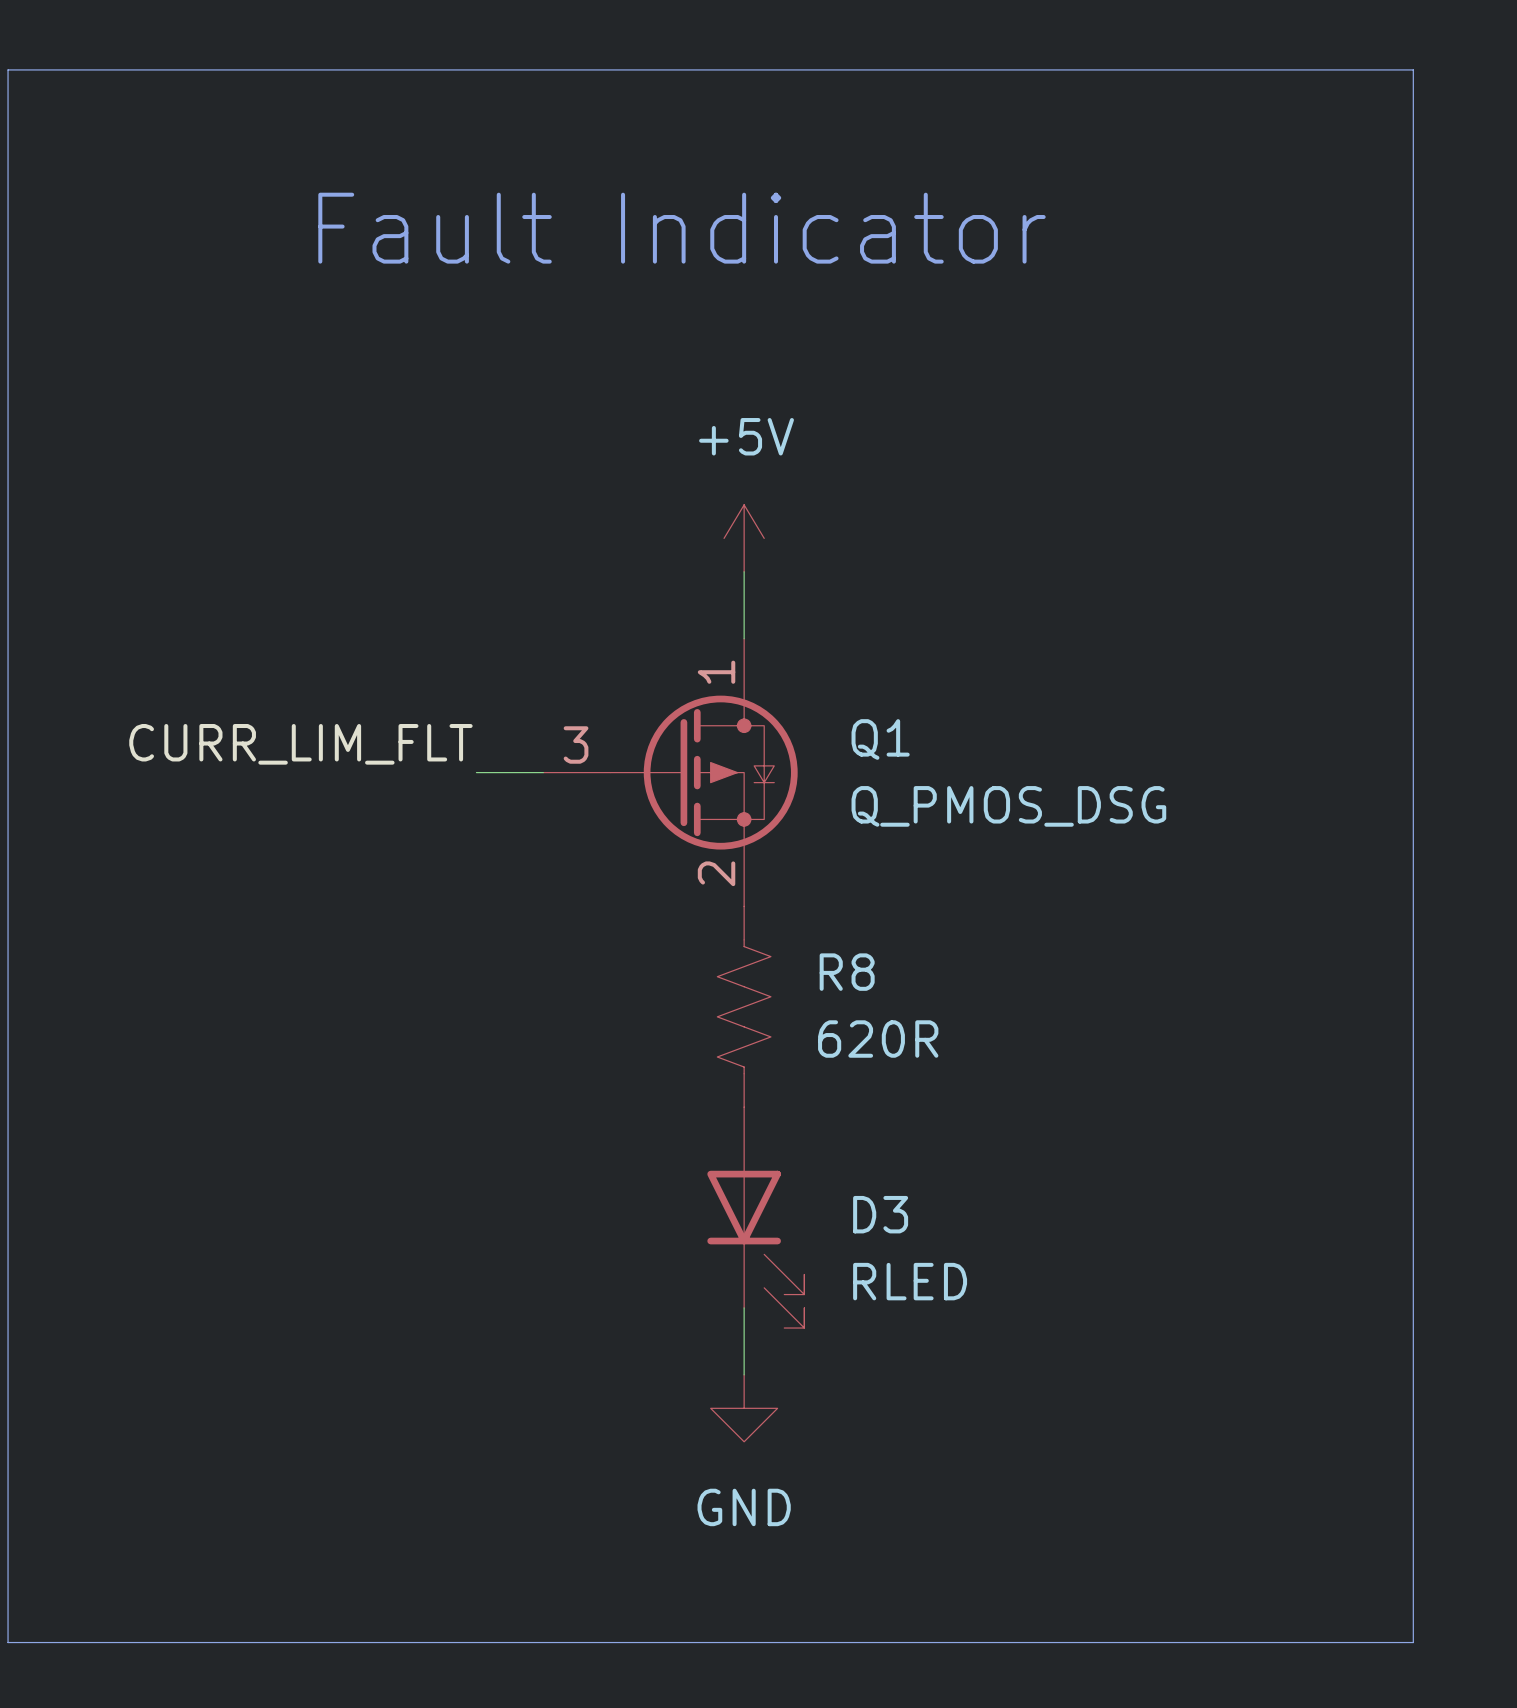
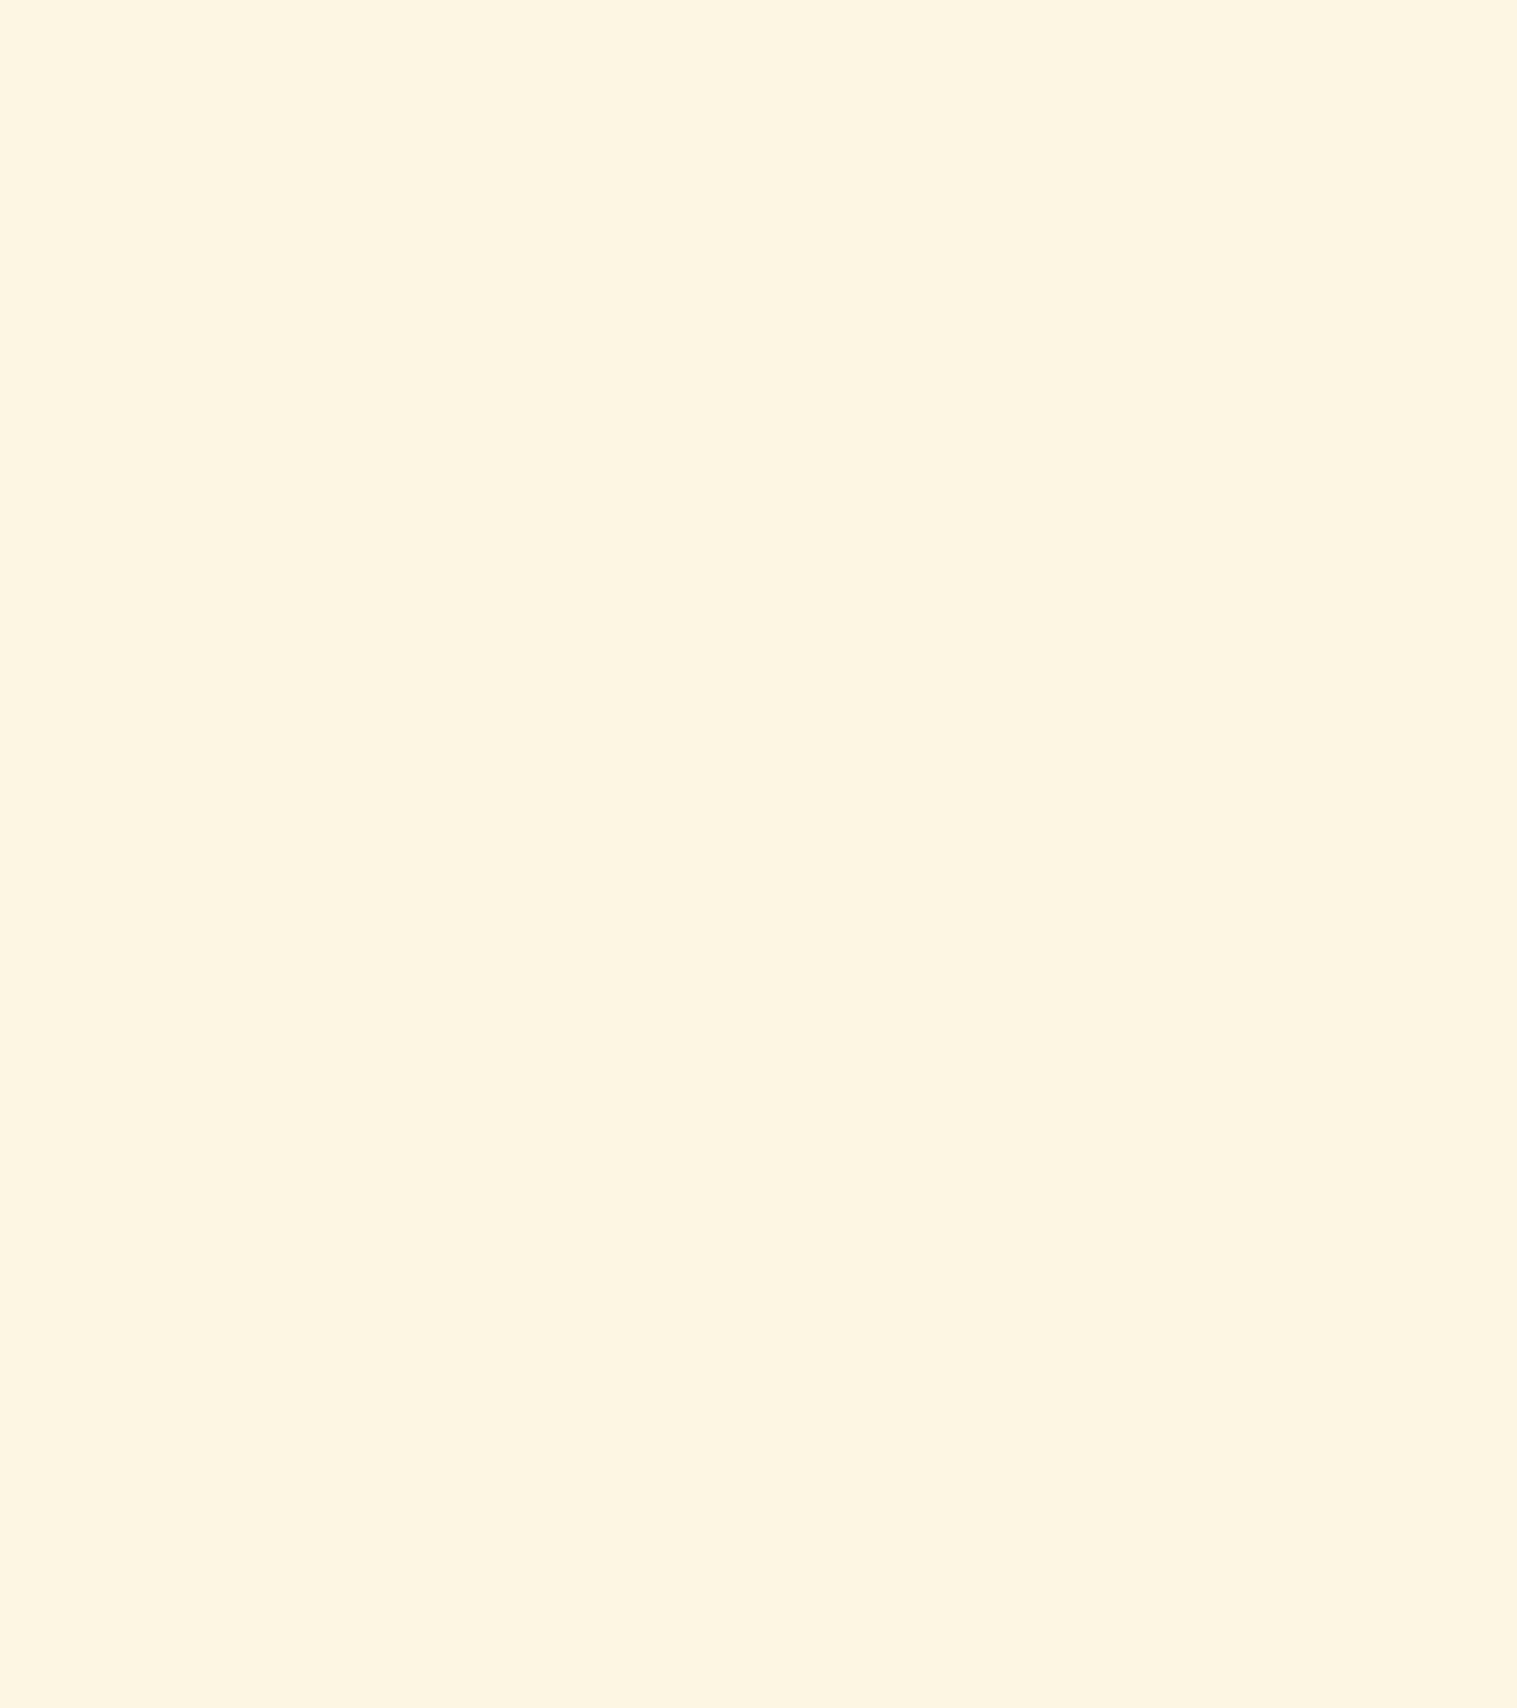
line: (8, 69) (1413, 69) (1413, 1642) (8, 1642) (8, 69) -> none
text: Fault Indicator (681, 228) -> none
power symbol: +5V (744, 538) -> none
wire: (744, 571) (744, 638) -> none
label: CURR_LIM_FLT (300, 744) -> none
wire: (476, 772) (543, 772) -> none
Q1: Q_PMOS_DSG (670, 772) -> none
R8: 620R (744, 1006) -> none
D3: RLED (755, 1217) -> none
wire: (744, 1307) (744, 1374) -> none
power symbol: GND (744, 1408) -> none

